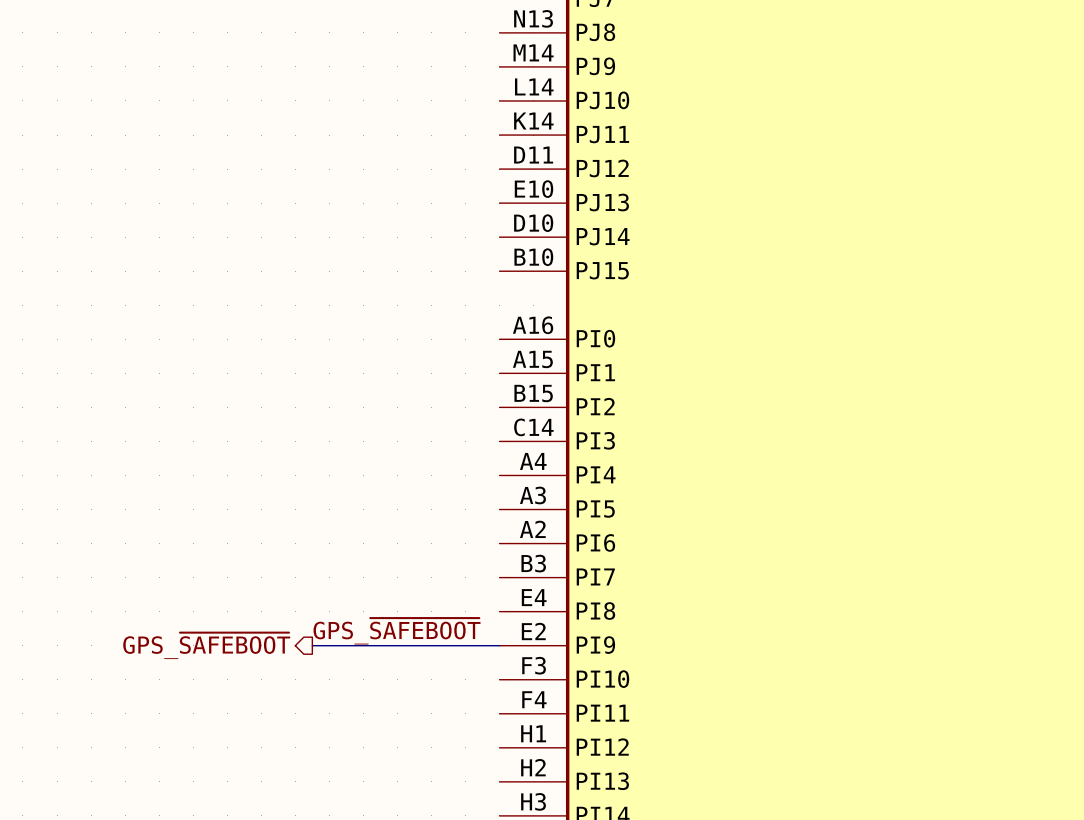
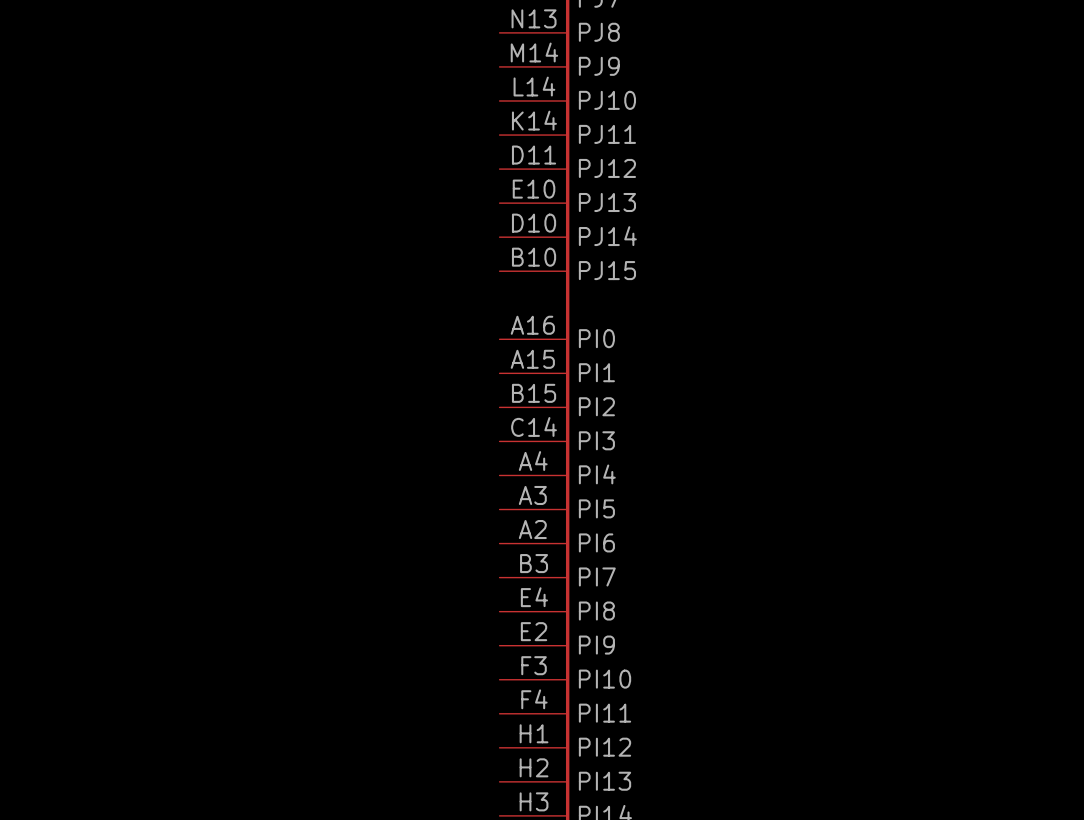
label: GPS_~{SAFEBOOT} (396, 631) -> none
hierarchical label: GPS_~{SAFEBOOT} (206, 645) -> none
wire: (312, 645) (499, 645) -> none

